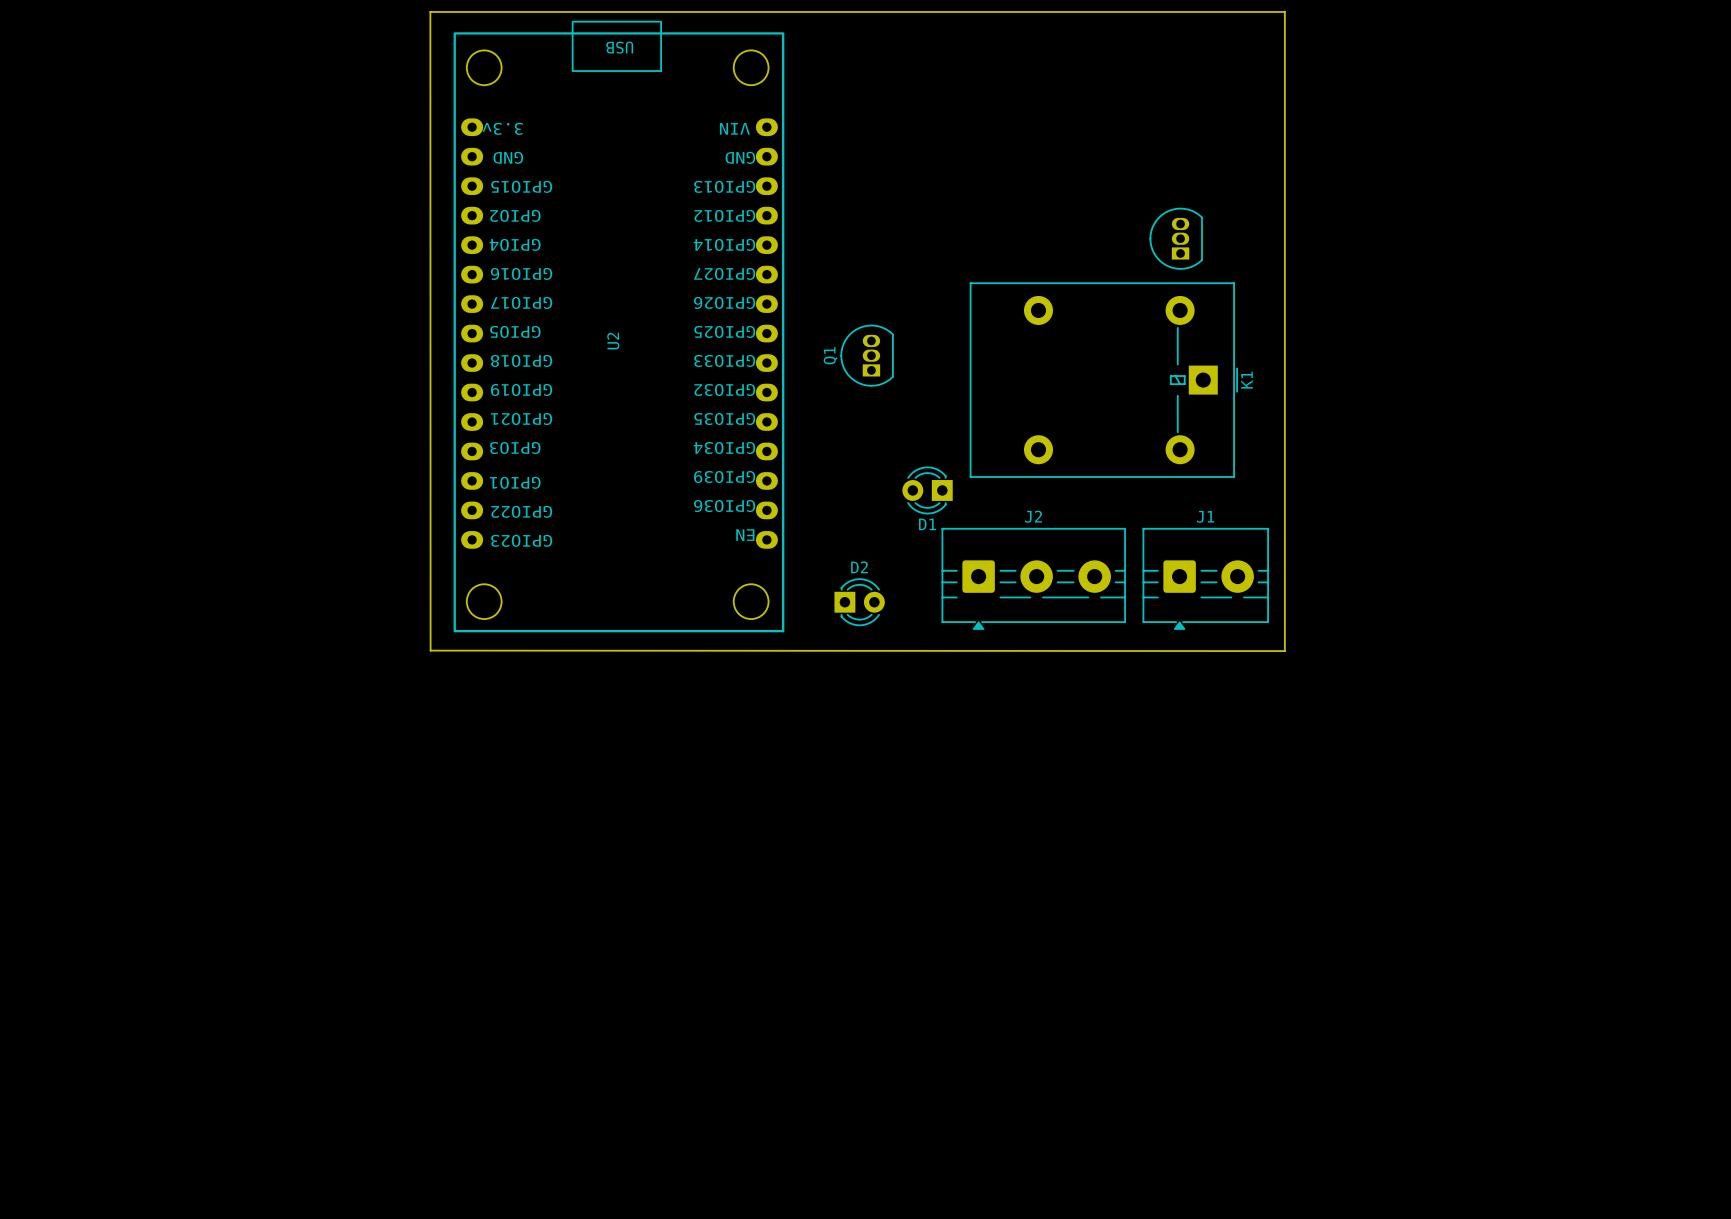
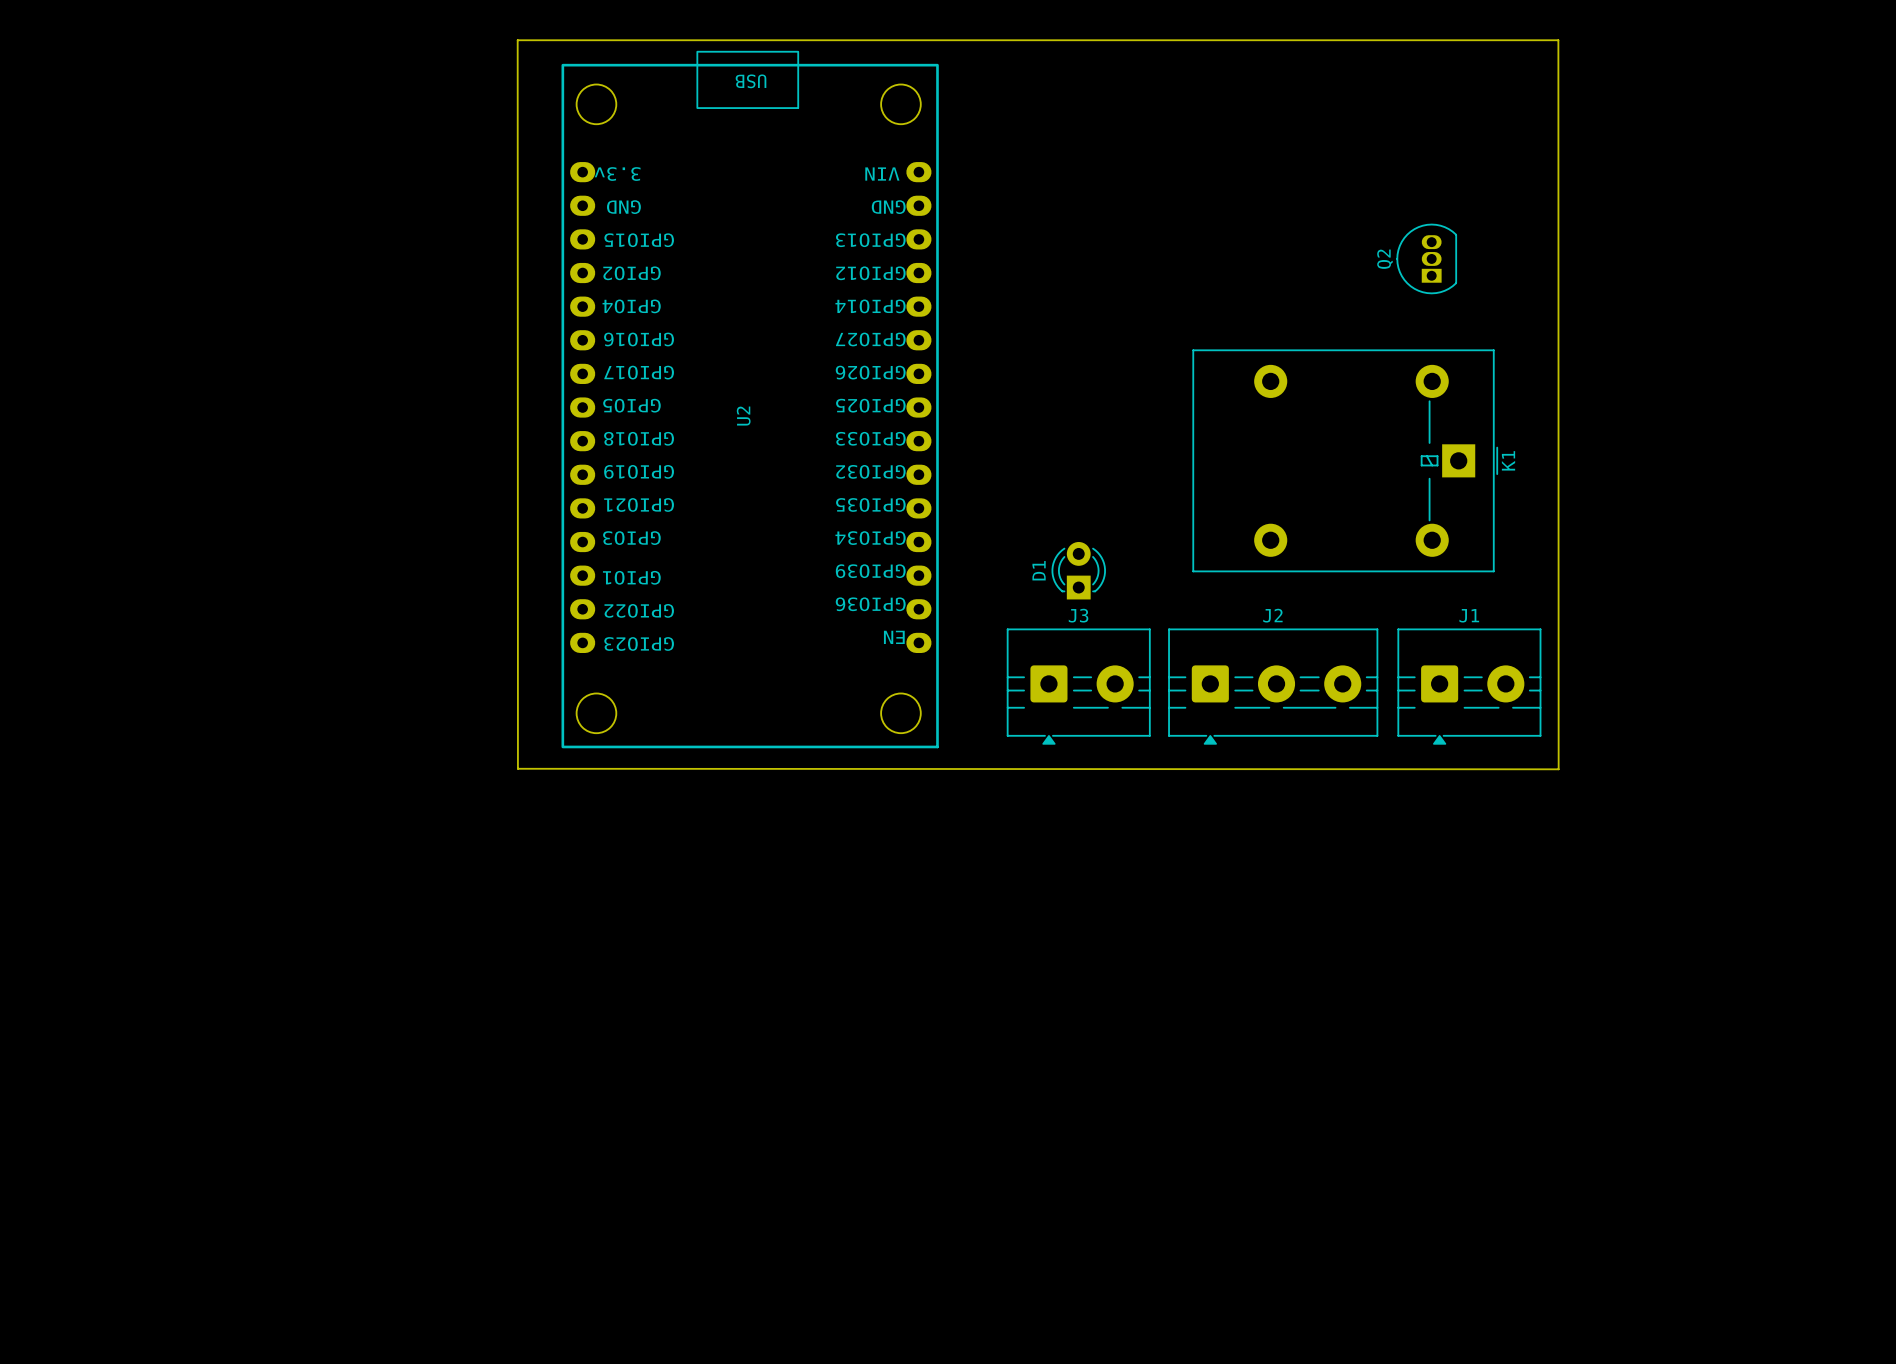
board edge: (1284, 11) (1284, 651) (430, 650) -> (1492, 40) (1558, 40) (1558, 769) (517, 768)
U2 footprint: [453, 21, 785, 633] -> [561, 51, 939, 749]
Q2: none -> (1426, 258)
part: (1176, 238) -> none
Q1: (867, 355) -> none
K1 position: (1103, 380) -> (1345, 460)
D1 rotation: 0° (927, 490) -> 90° clockwise (1078, 570)
J3: none -> (1078, 686)
J2 position: (1033, 578) -> (1273, 686)
J1 position: (1205, 578) -> (1469, 686)
D2: (859, 602) -> none

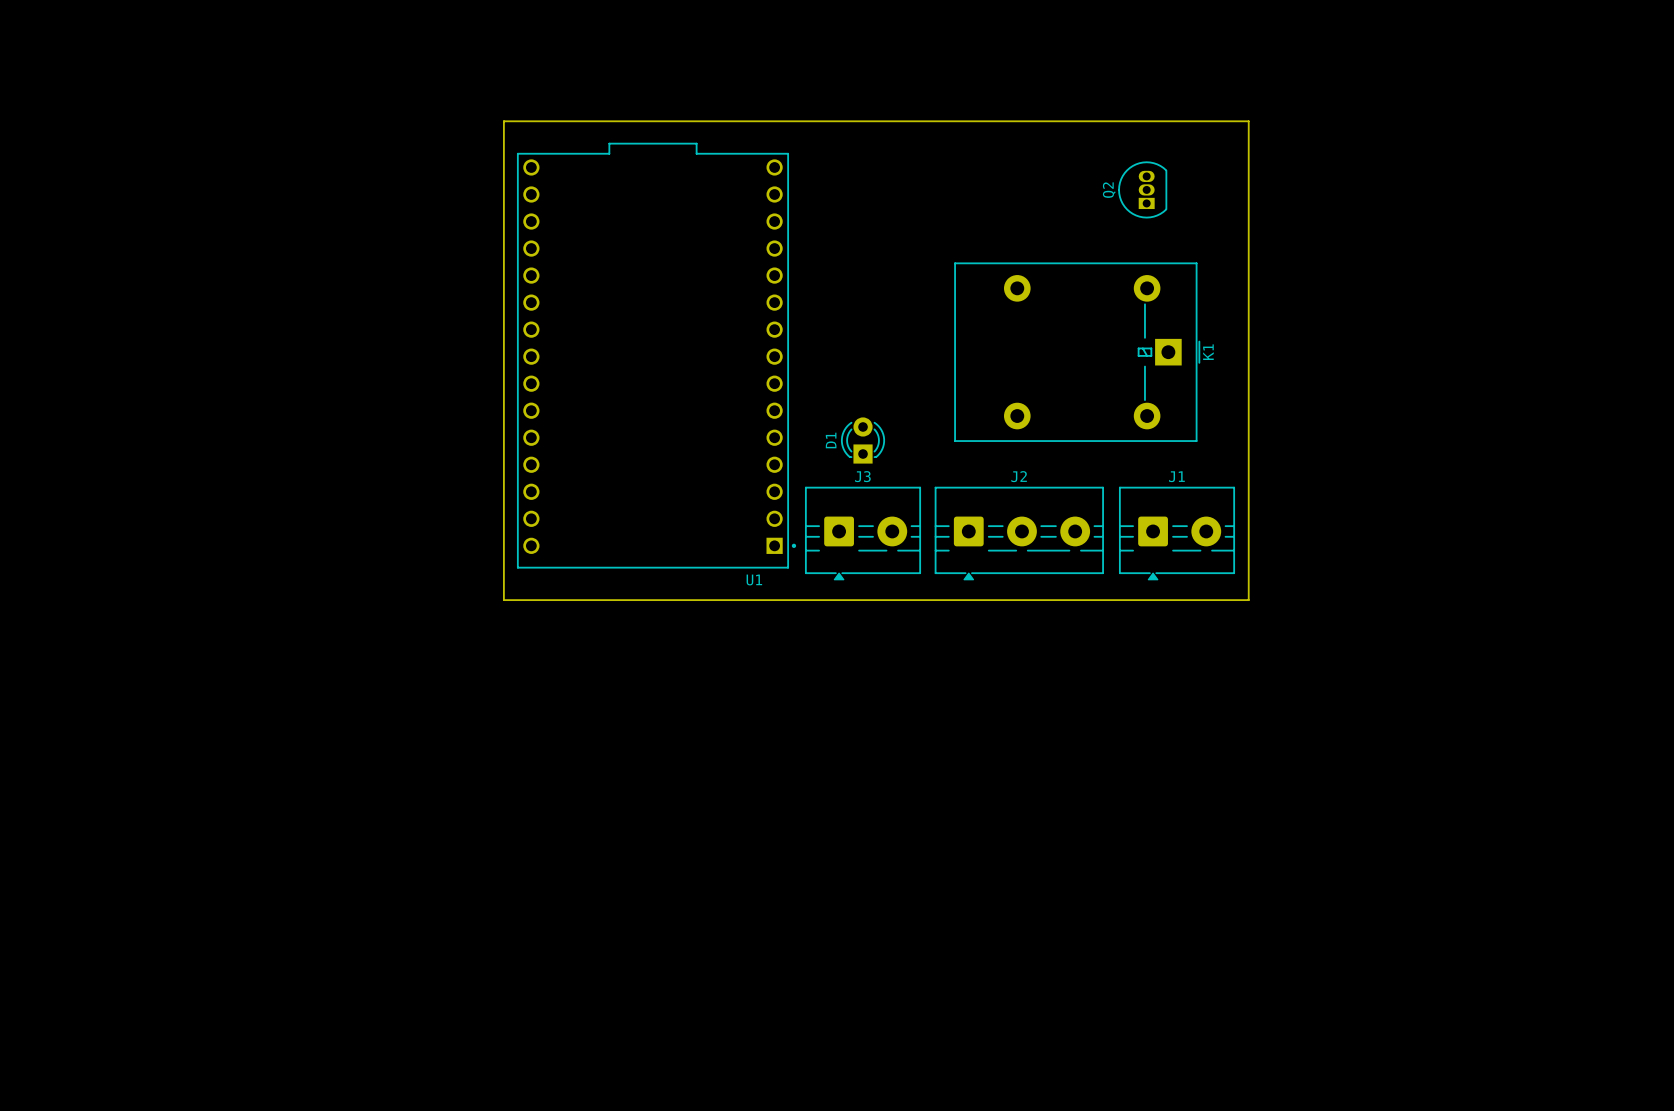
board edge: (517, 40) (1558, 40) (1558, 769) (517, 768) (517, 40) -> (503, 121) (503, 600) (1248, 600) (1248, 121) (503, 121)
U2: (750, 399) -> none
U1: none -> (656, 355)

